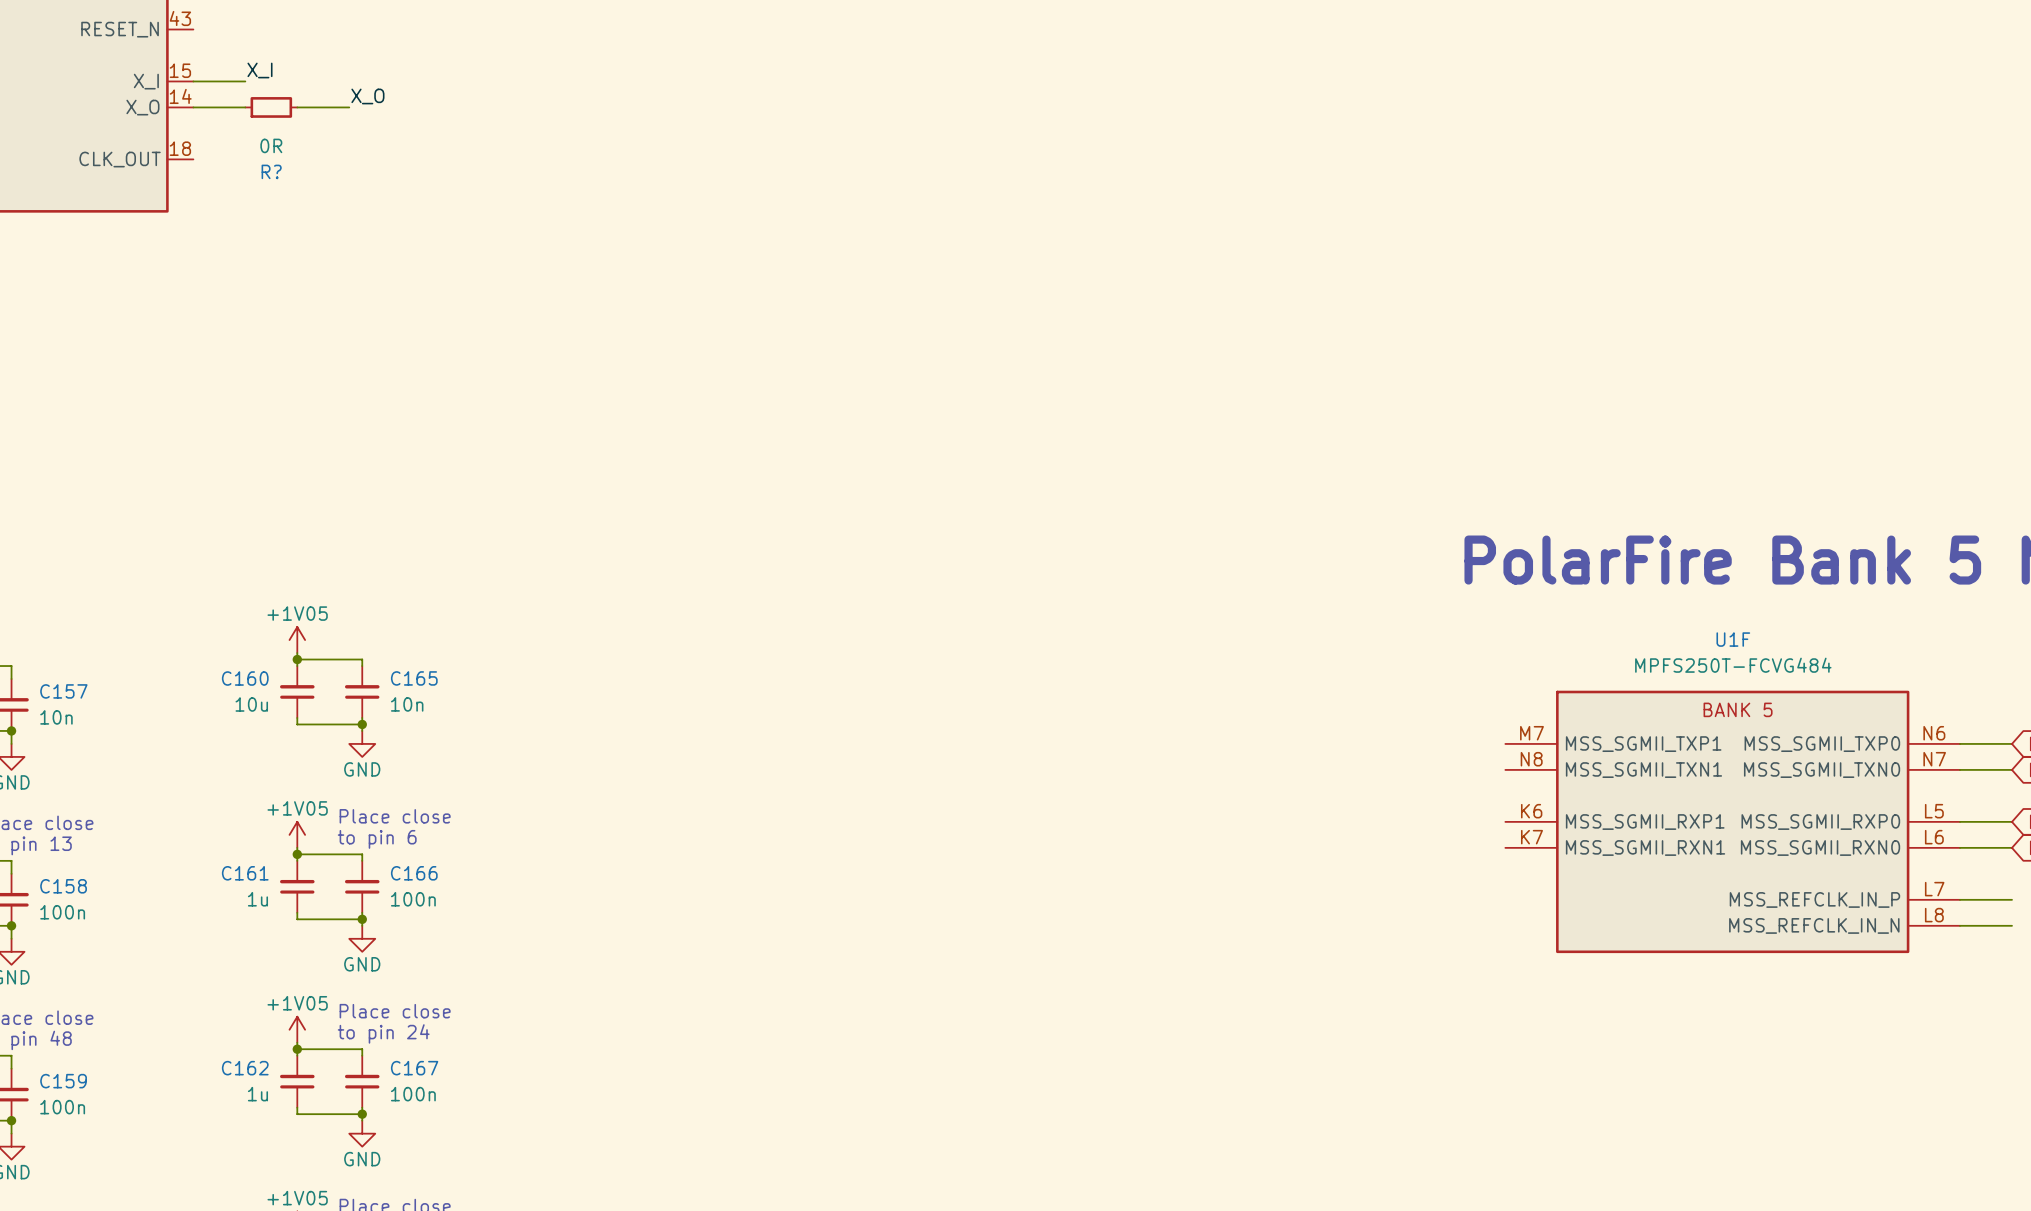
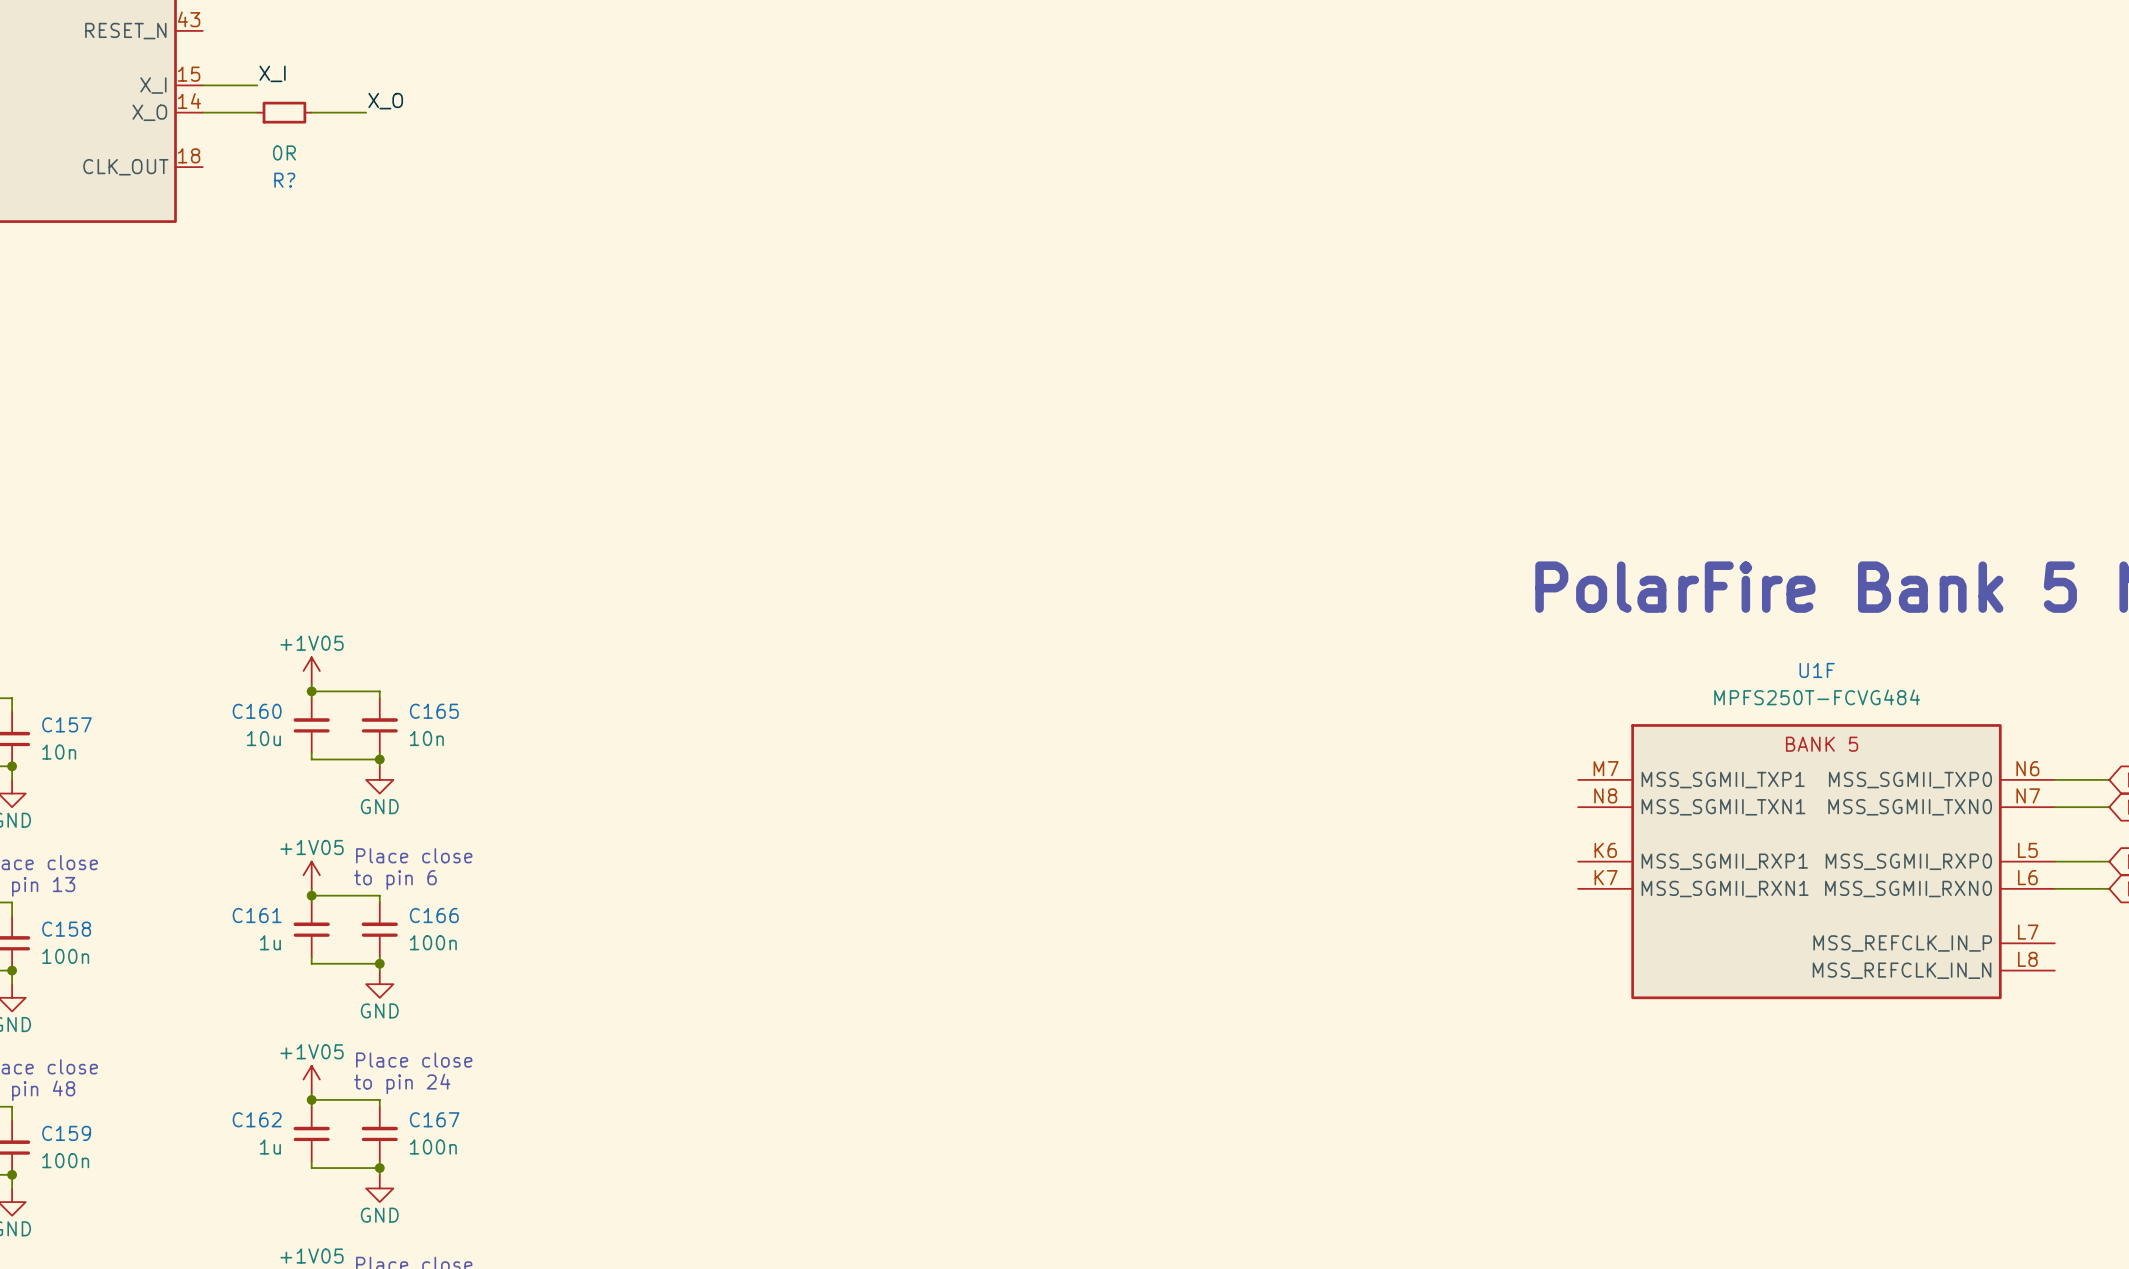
wire: (1960, 899) (2011, 899) -> none
wire: (1960, 925) (2011, 925) -> none

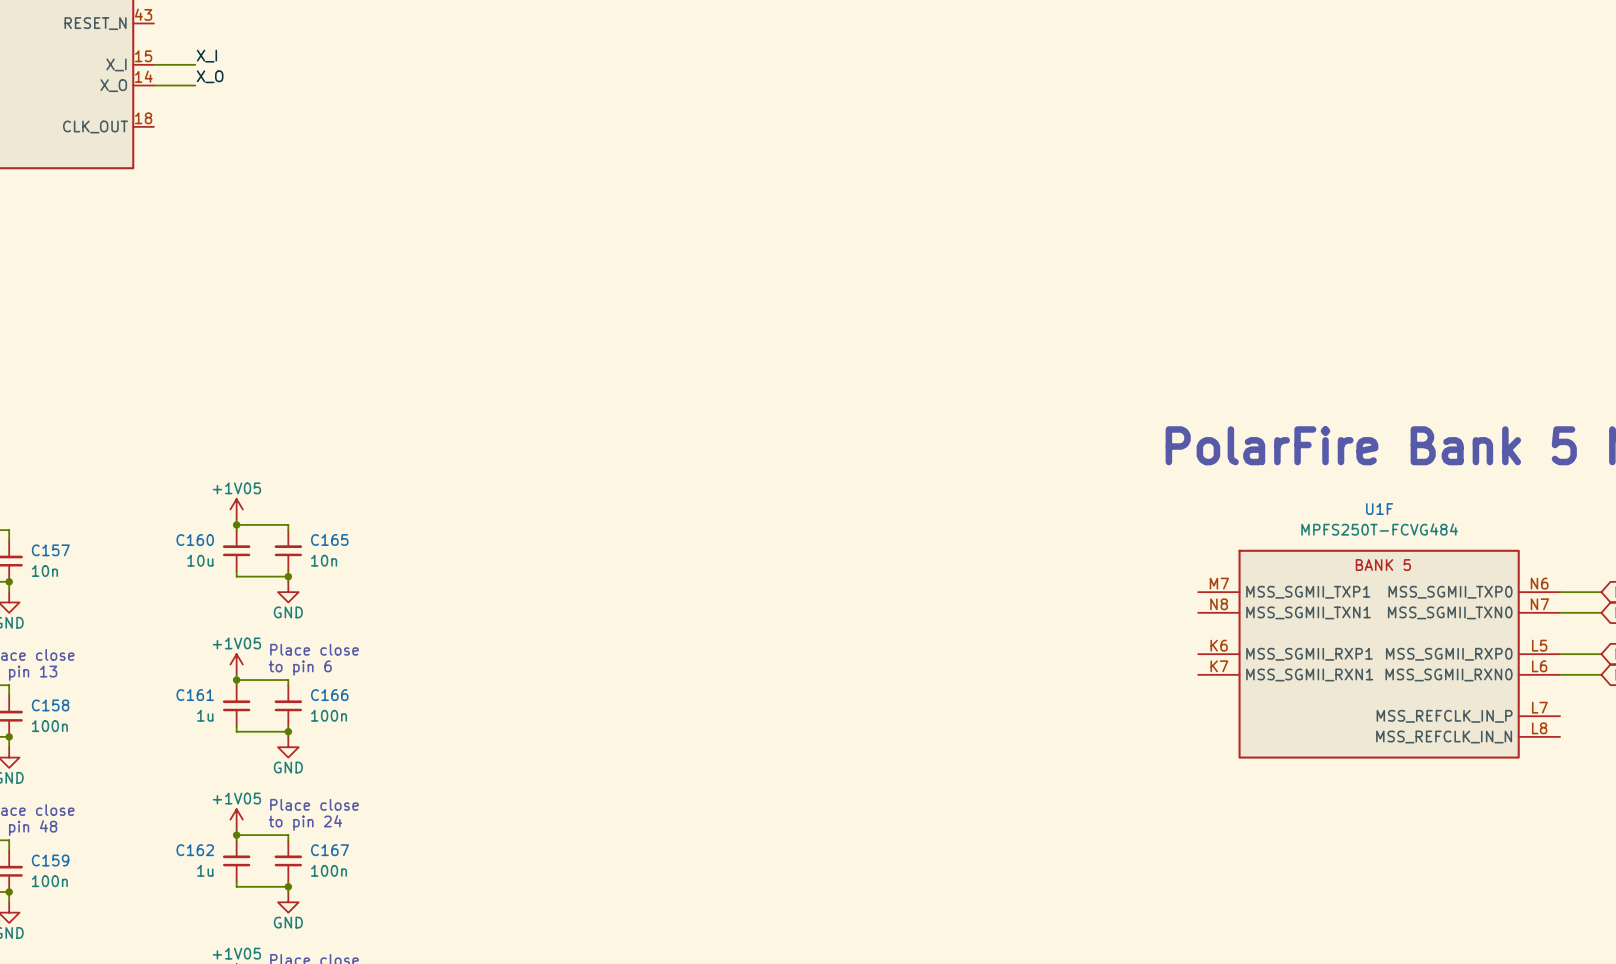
label position: X_O (385, 101) -> X_O (210, 76)
R?: (284, 112) -> none
wire: (311, 112) (366, 112) -> none

